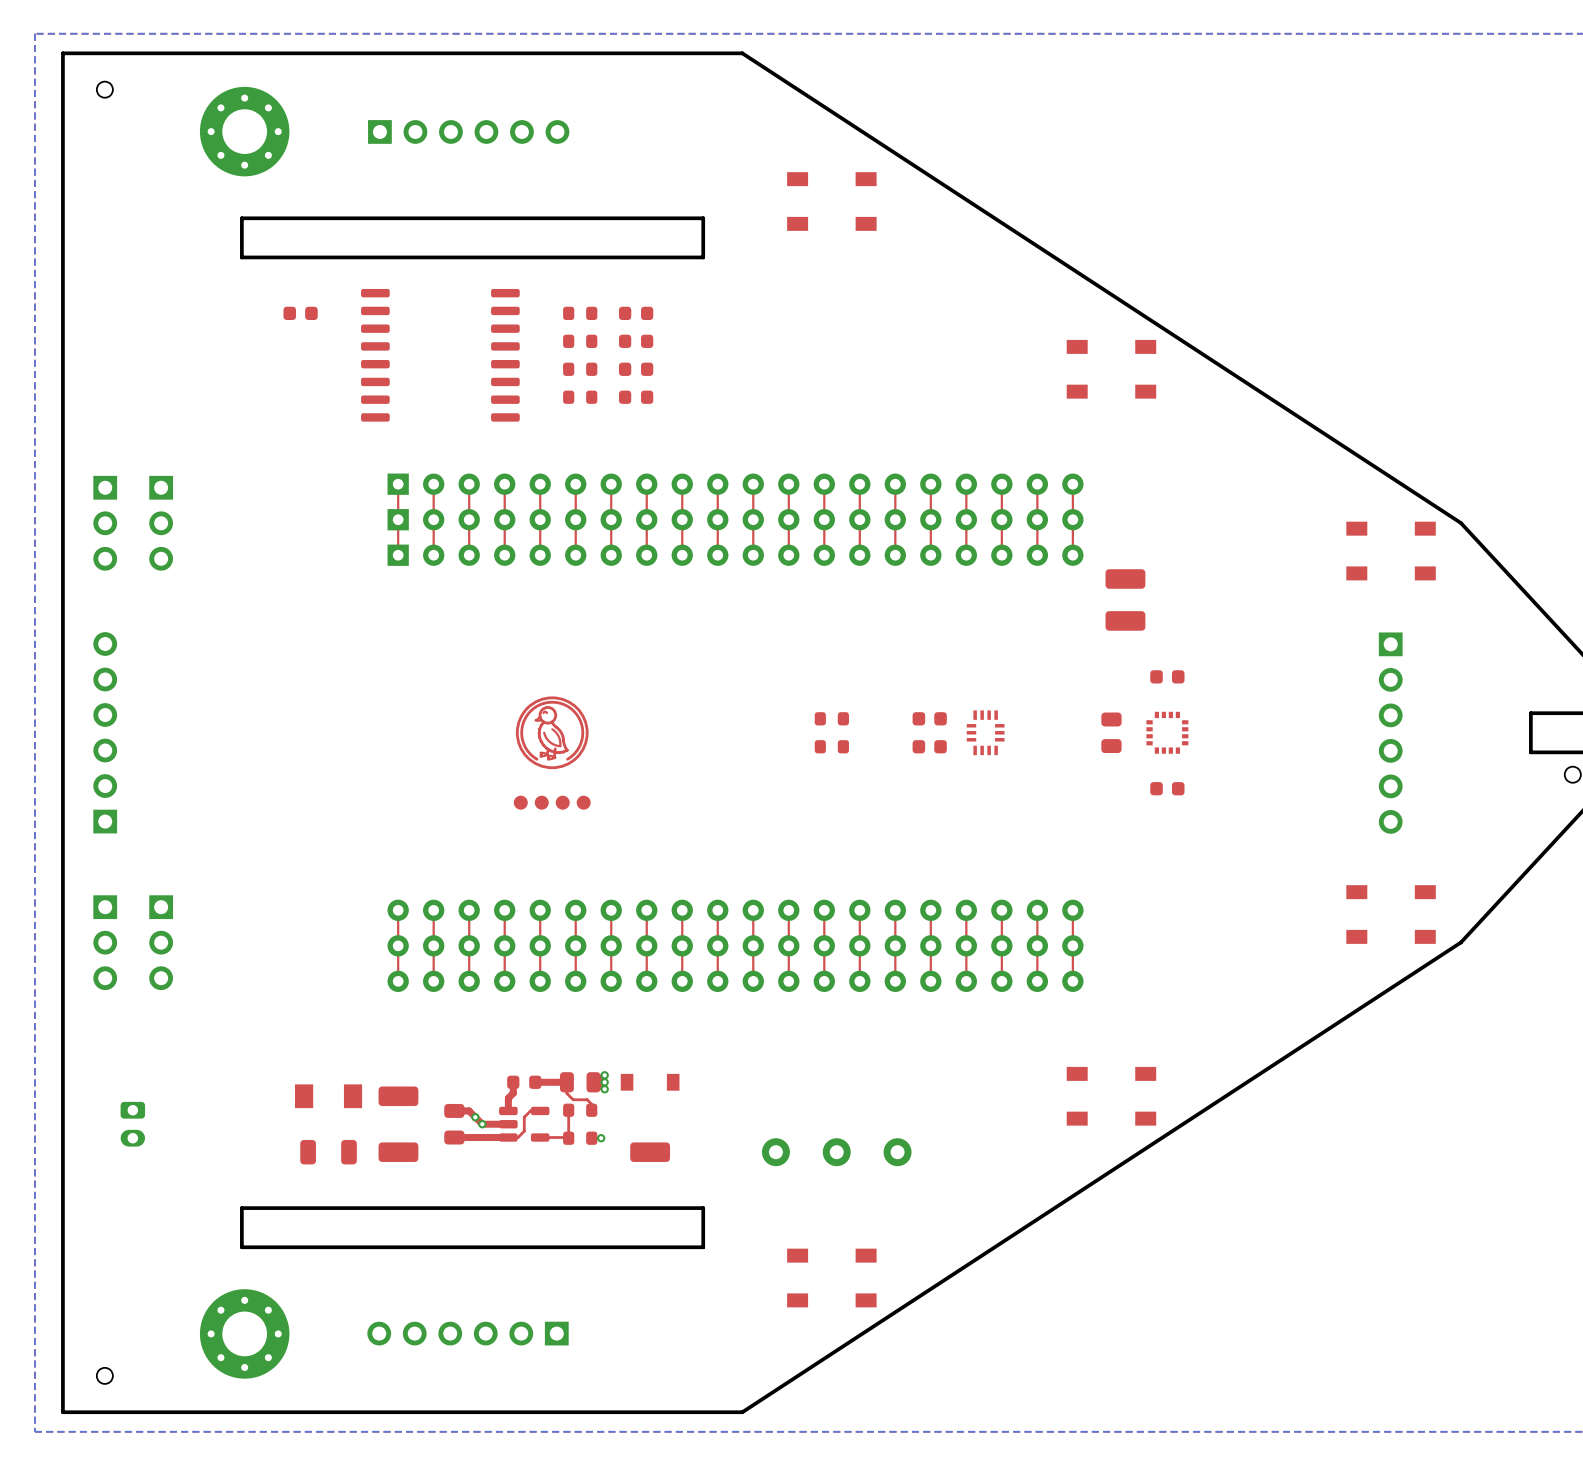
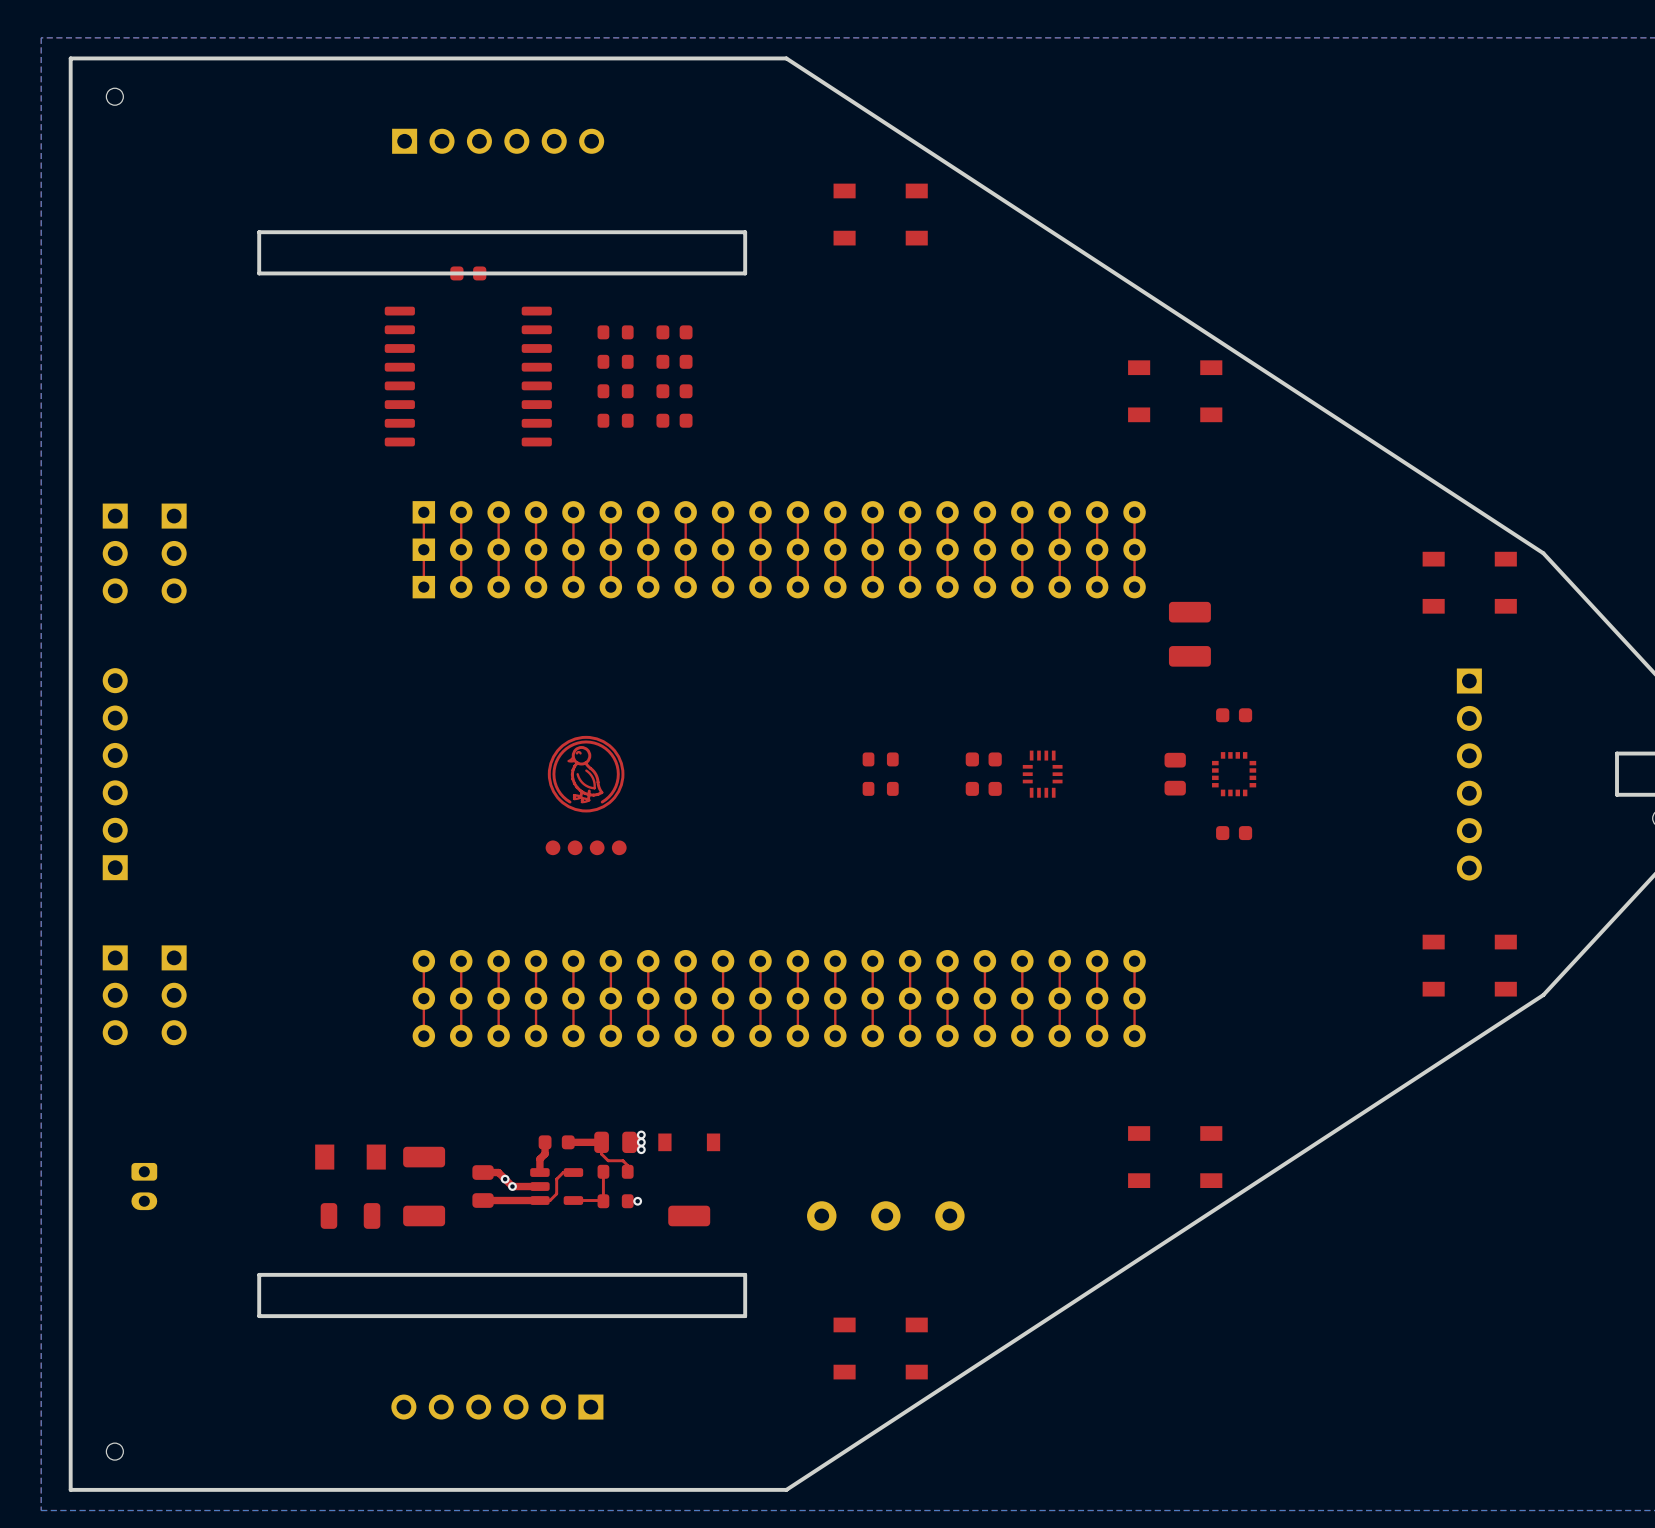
part: (244, 131) -> none
part position: (300, 313) -> (468, 273)
part: (244, 1333) -> none

